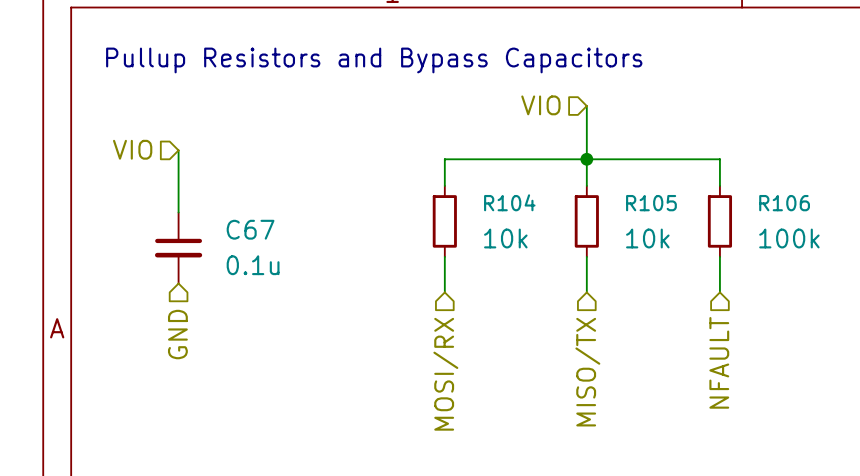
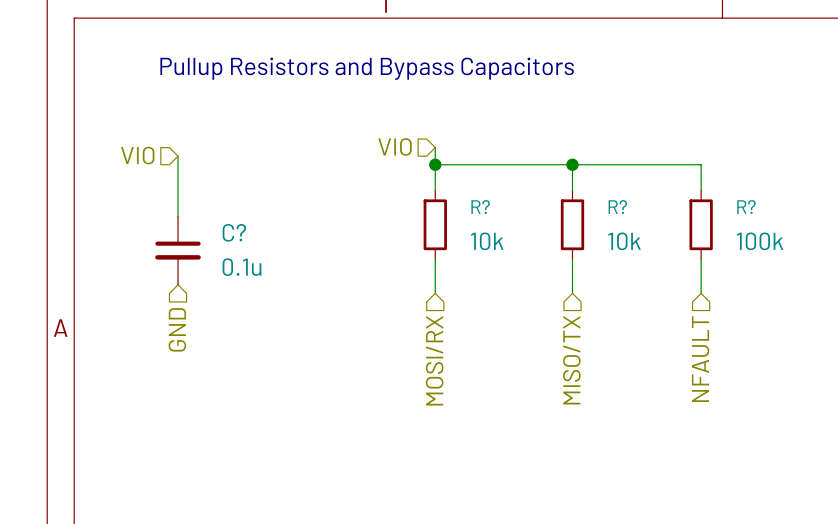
hierarchical label position: VIO (540, 105) -> VIO (395, 146)
wire: (586, 106) (586, 159) -> none
wire: none -> (435, 147) (435, 164)
junction: none -> (435, 164)
R104 name: R104 (509, 202) -> R? (480, 207)
R105 name: R105 (651, 203) -> R? (617, 207)
R106 name: R106 (784, 203) -> R? (746, 207)
C67 name: C67 (250, 229) -> C? (234, 232)

